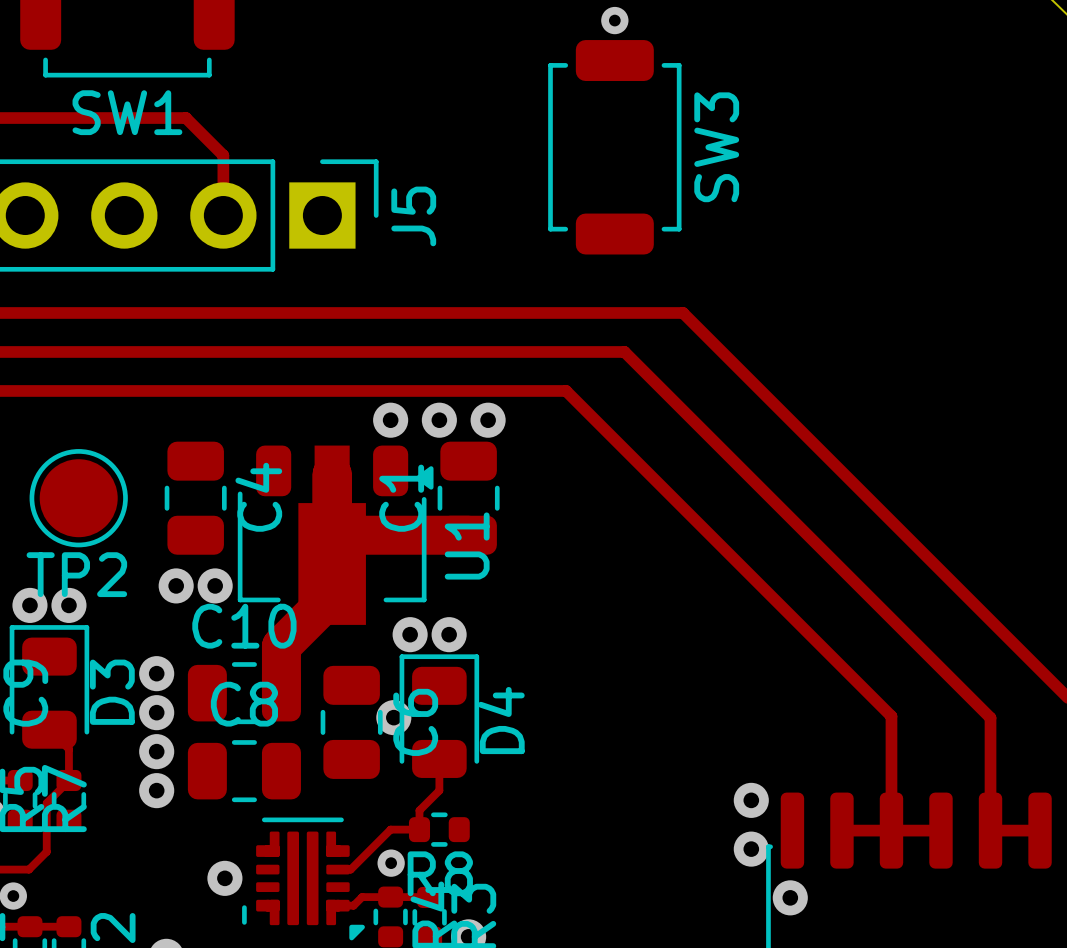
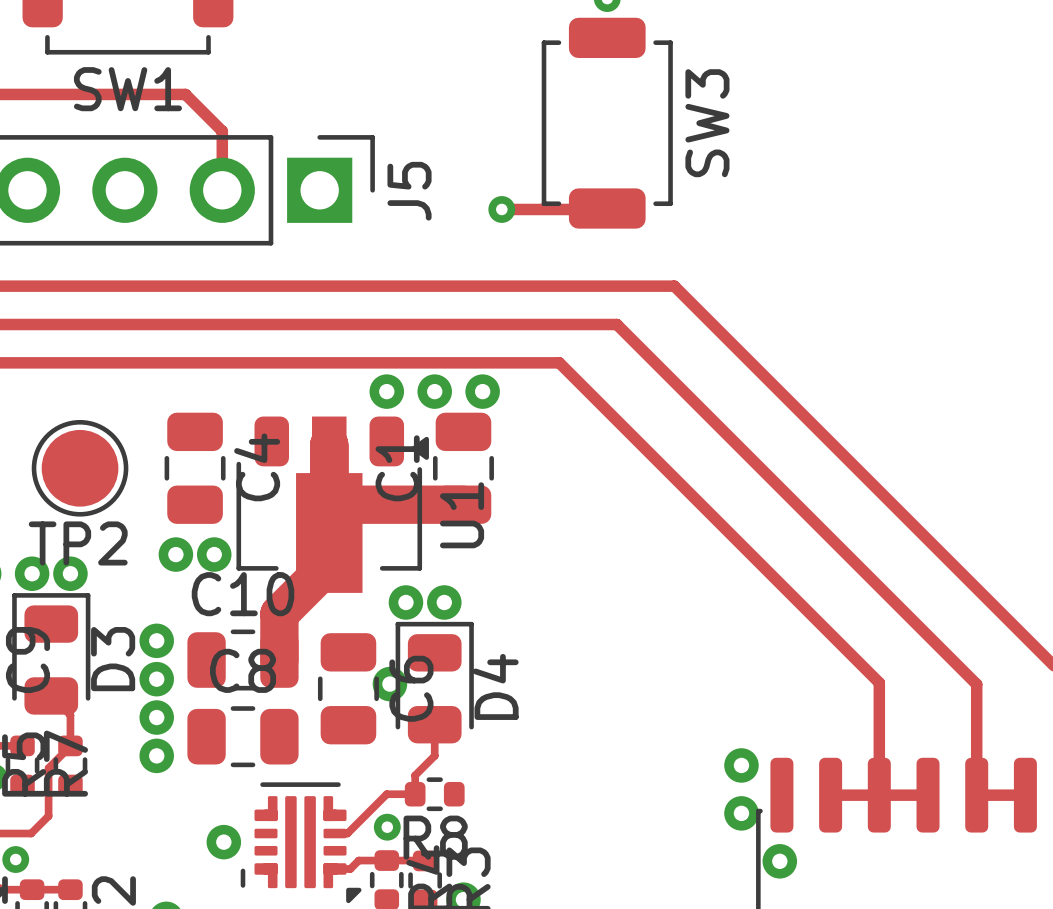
track: none -> (607, 208) (501, 209)
via: none -> (501, 209)

